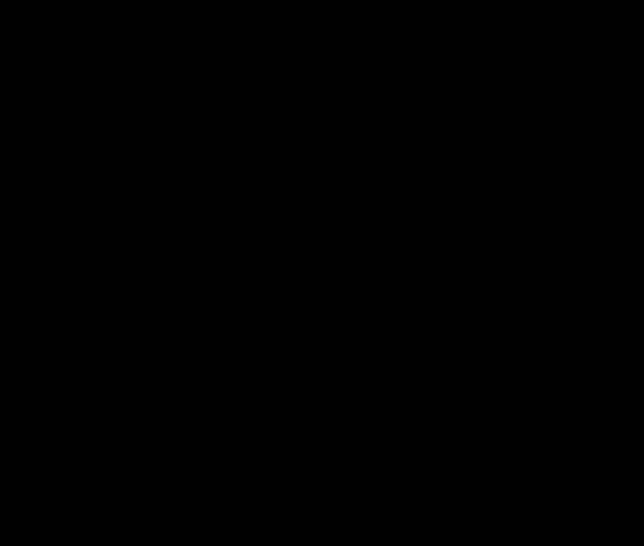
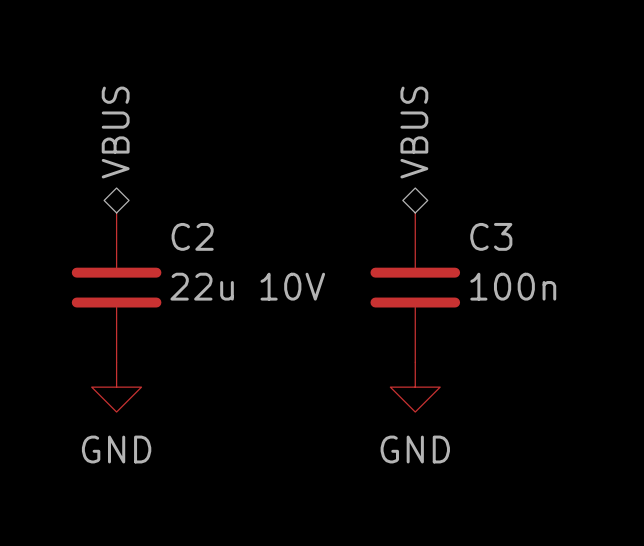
hierarchical label: none -> VBUS (115, 132)
hierarchical label: none -> VBUS (414, 132)
C2: none -> 22u 10V (116, 287)
C3: none -> 100n (415, 287)
power symbol: none -> GND (116, 387)
power symbol: none -> GND (415, 387)

